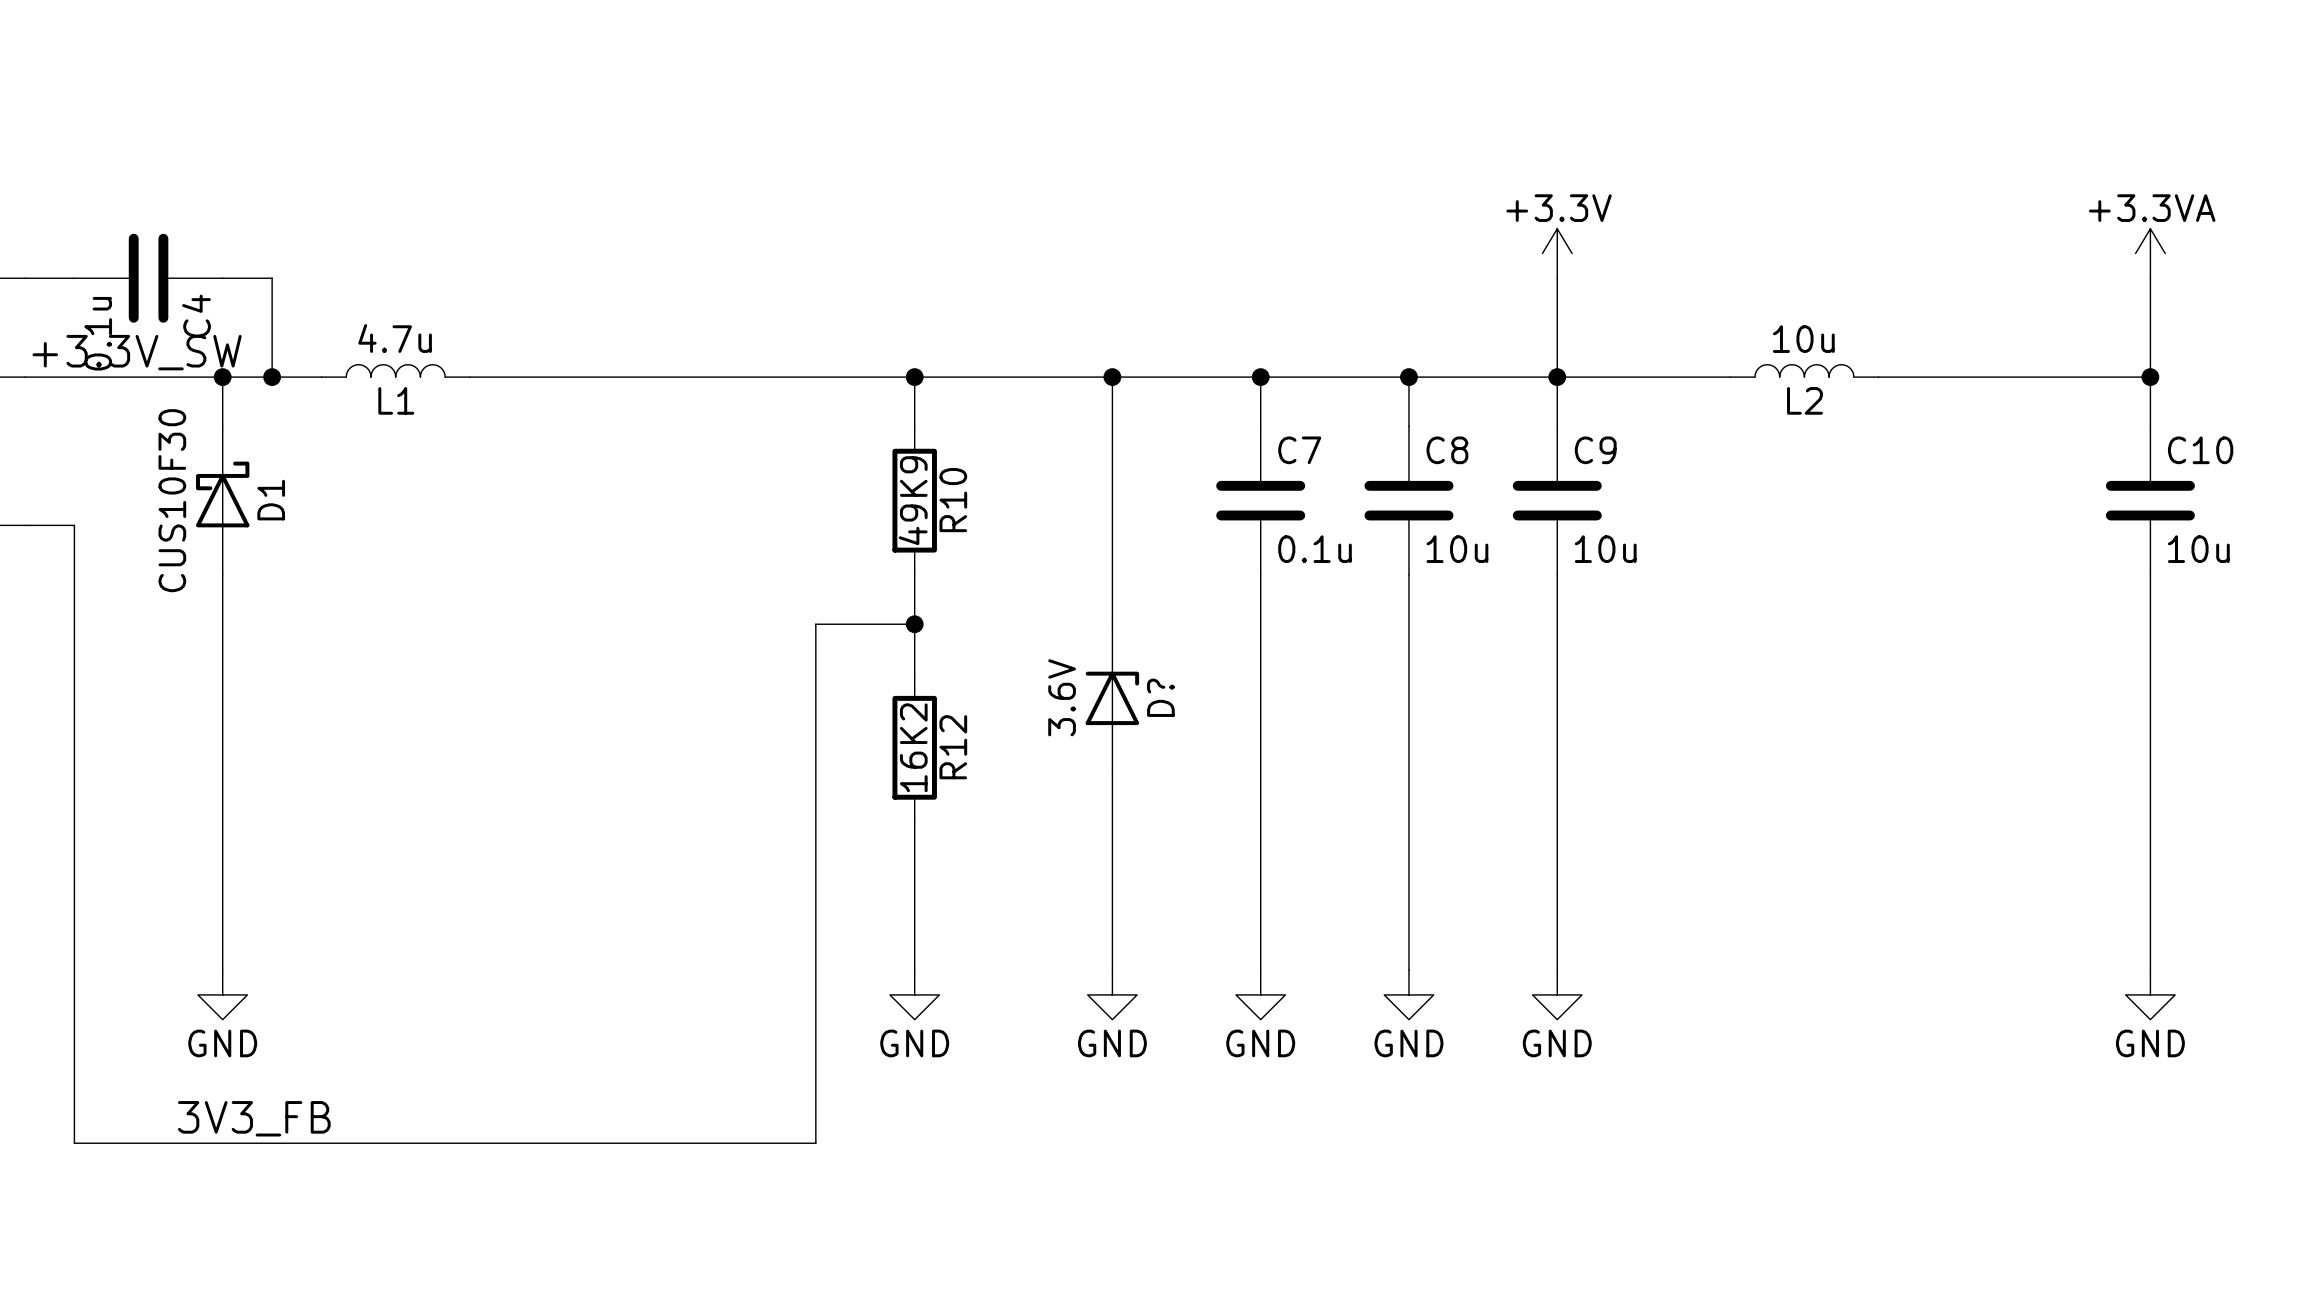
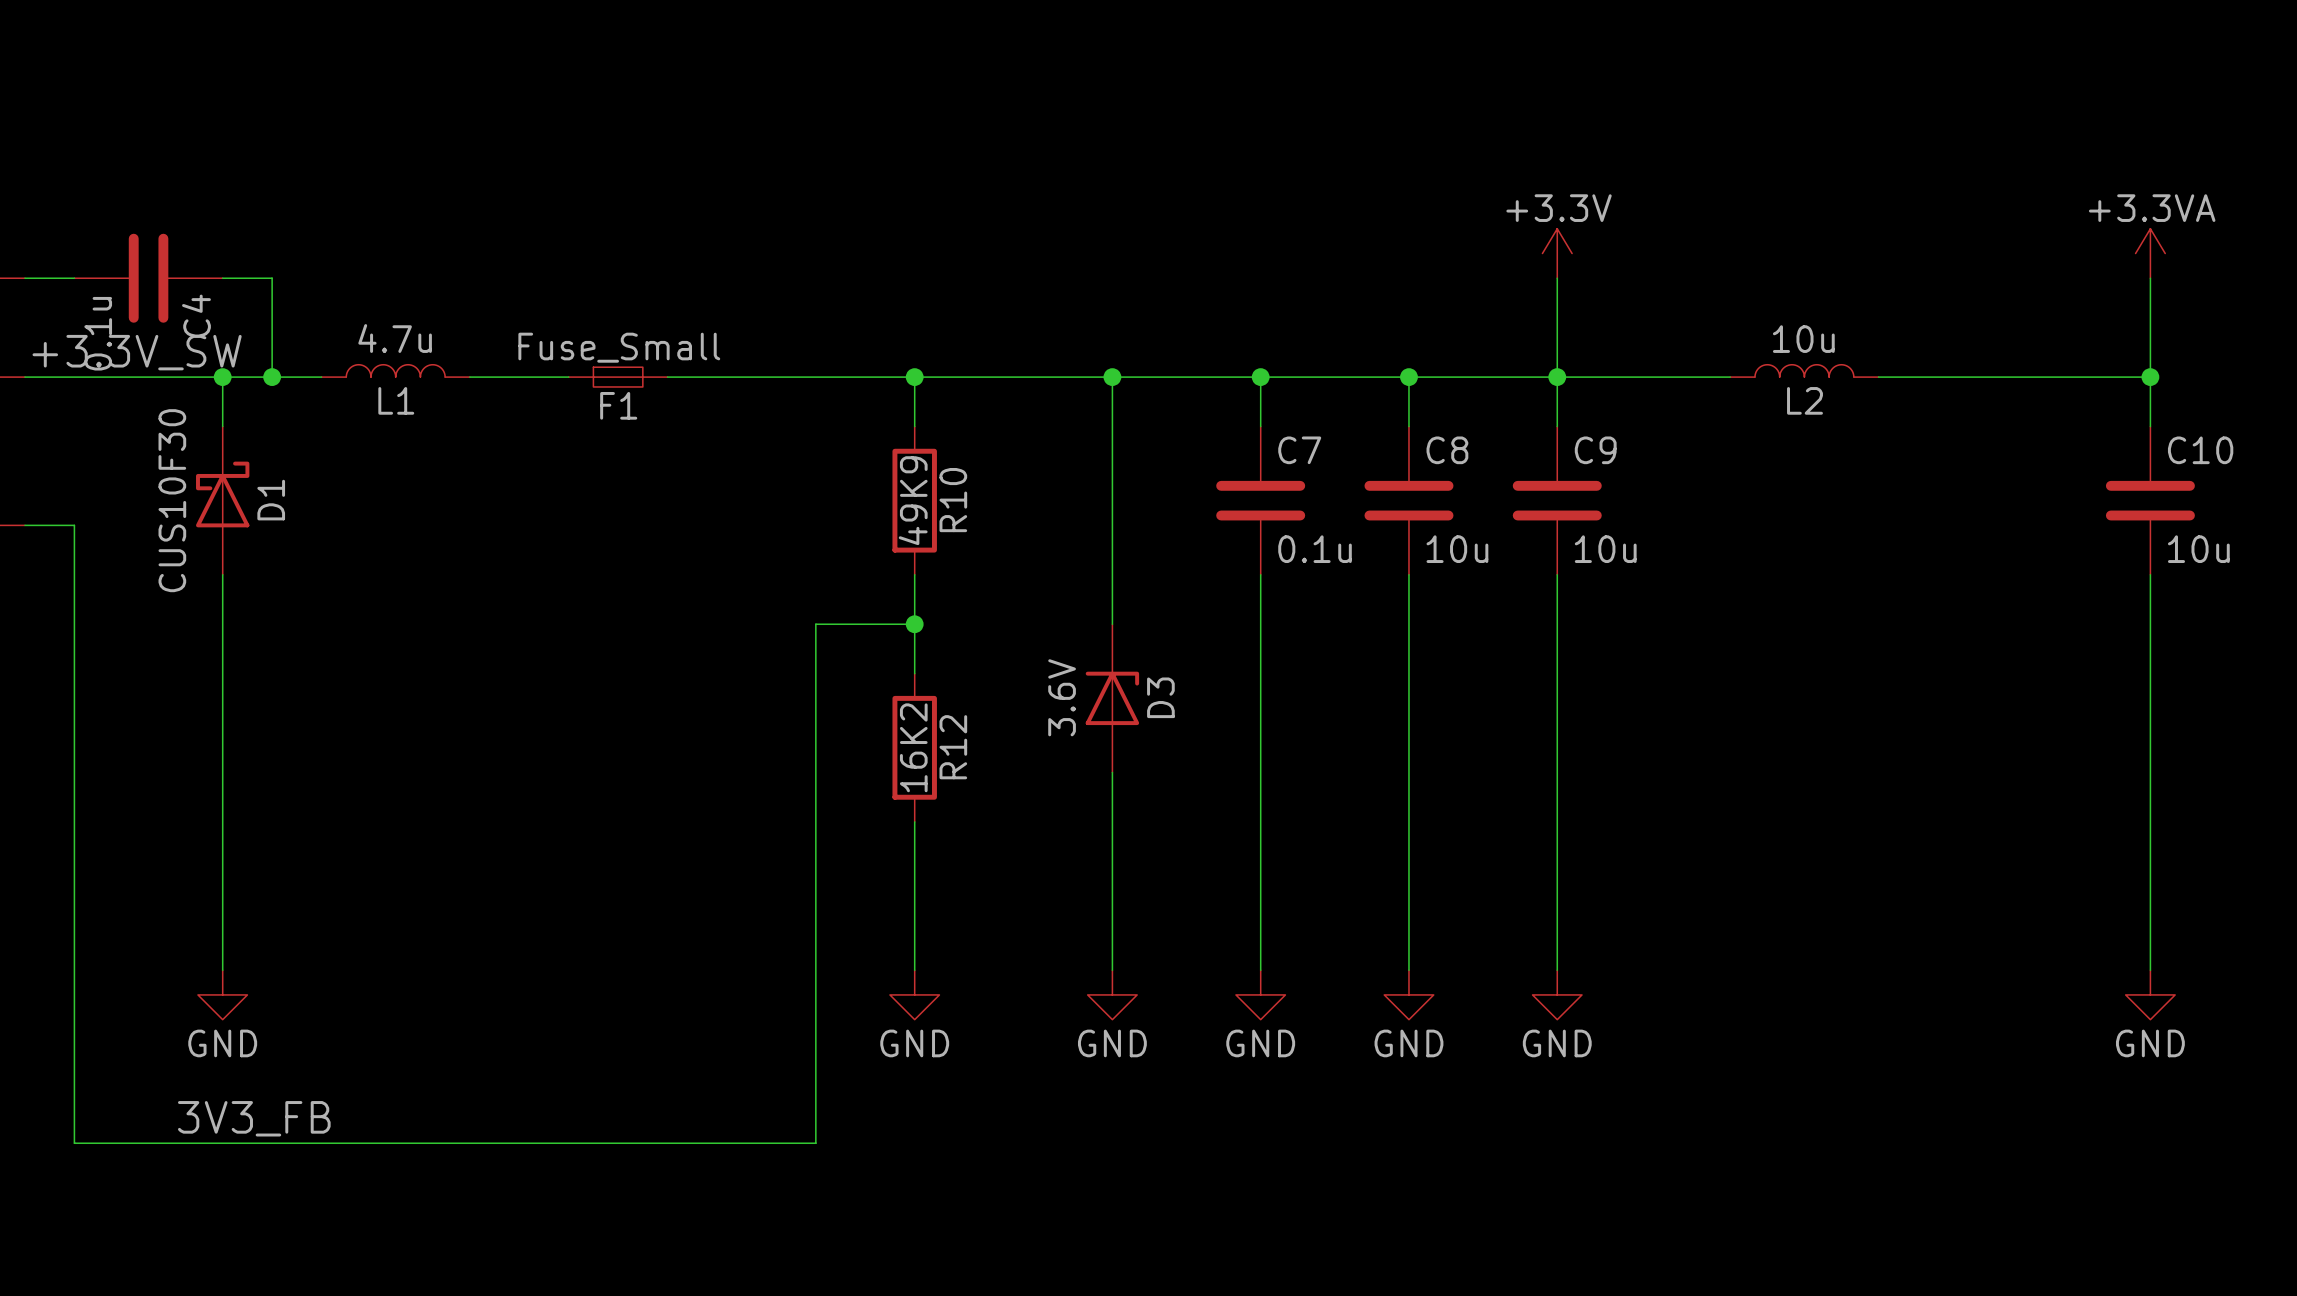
F1: none -> Fuse_Small (618, 377)
D? name: D? (1160, 697) -> D3 (1160, 697)

